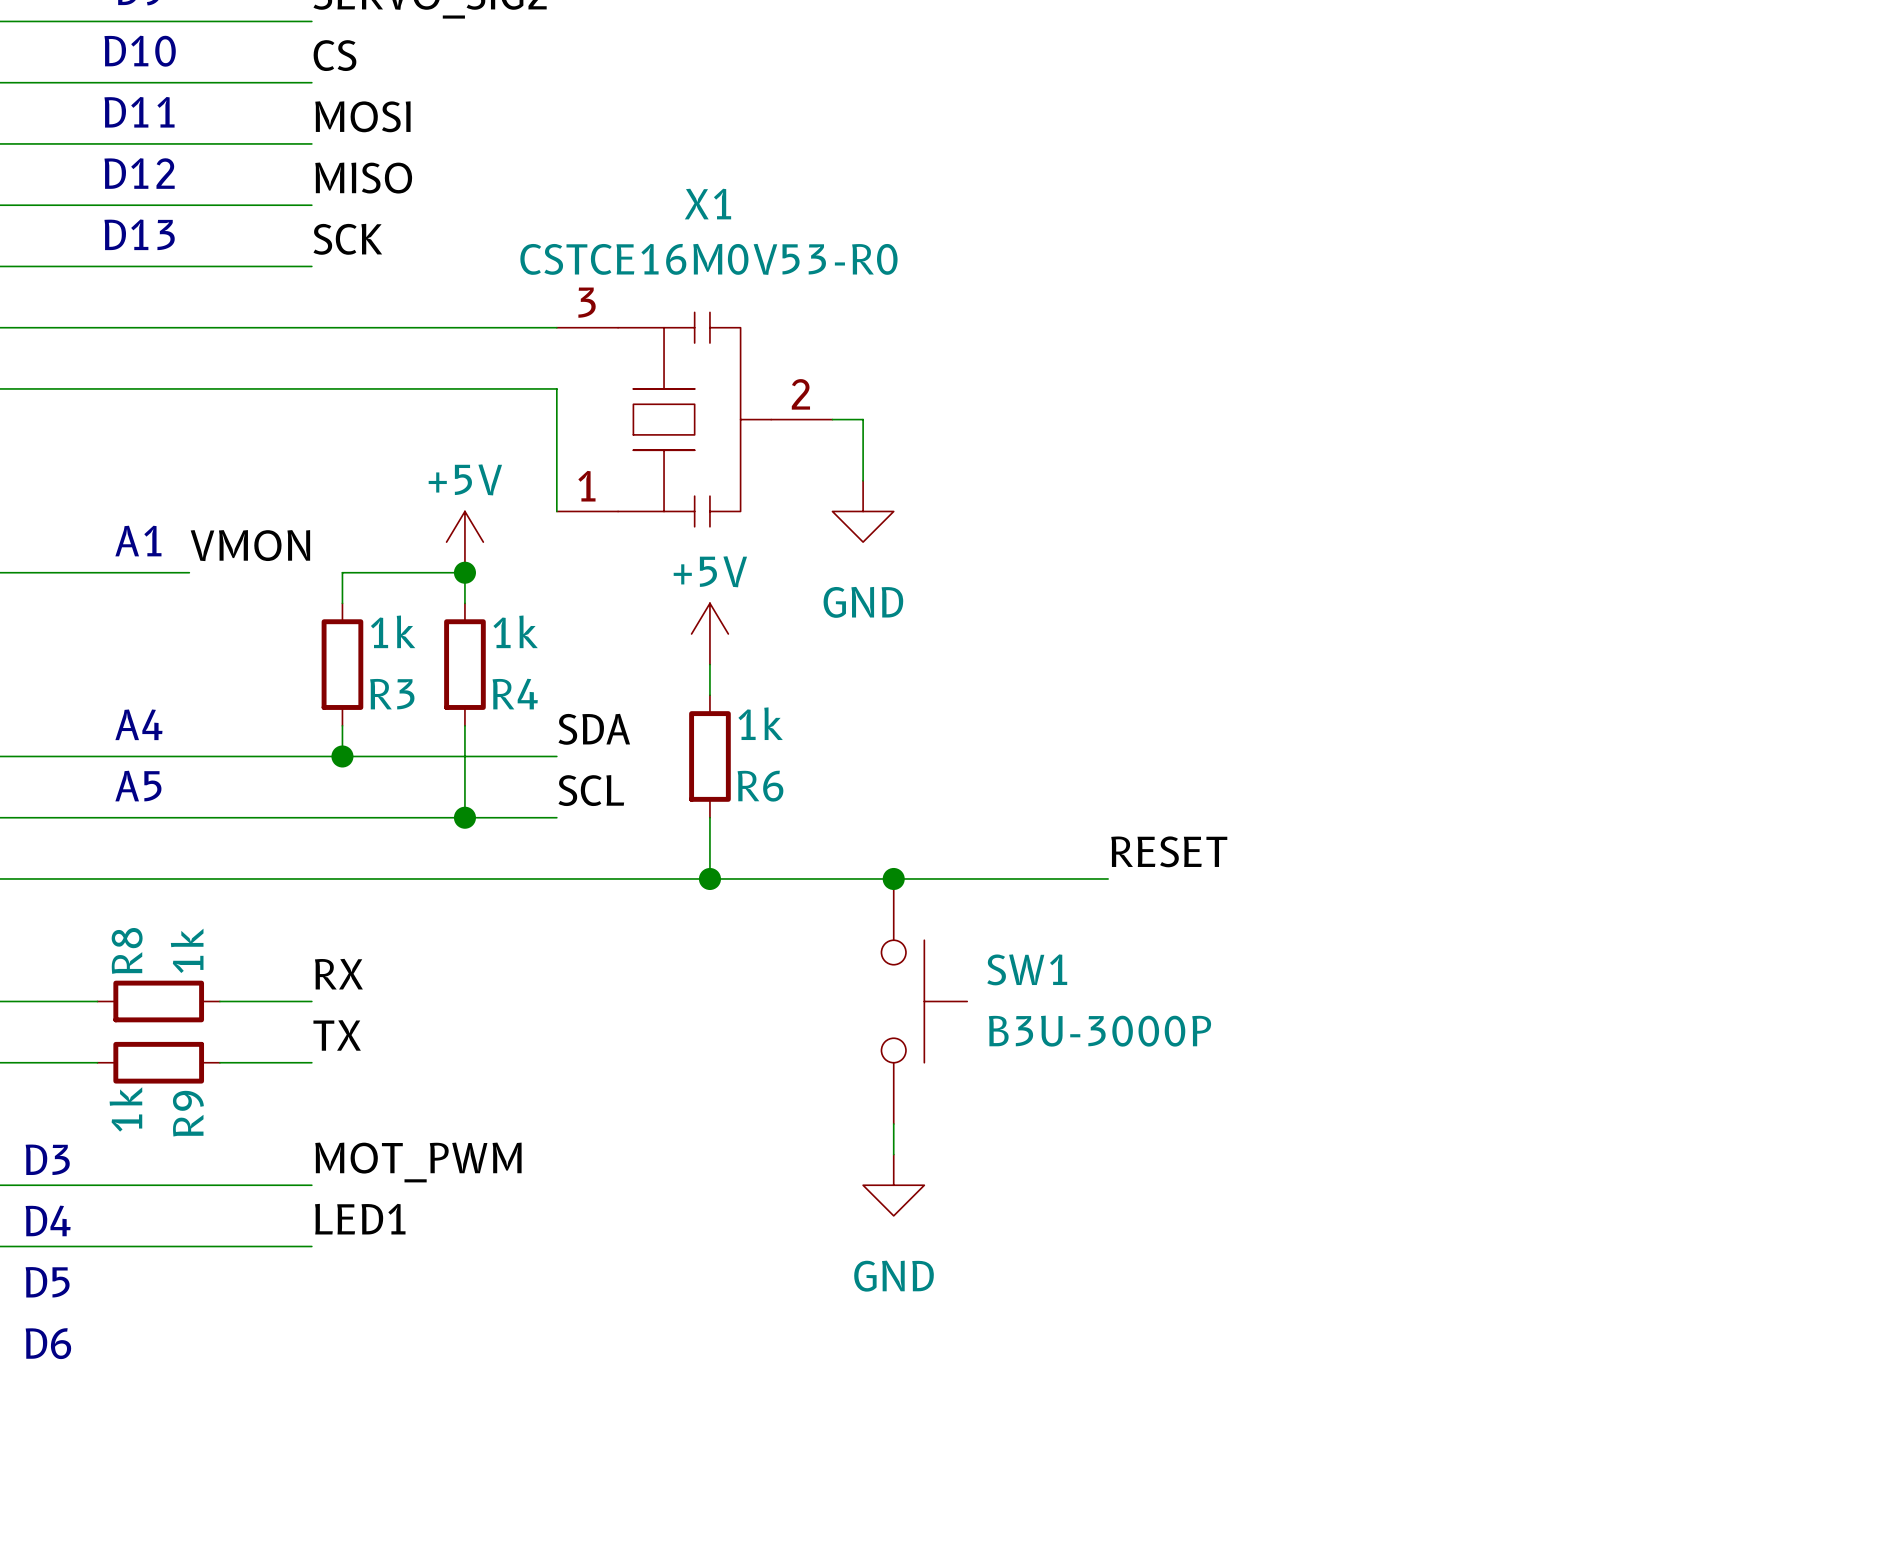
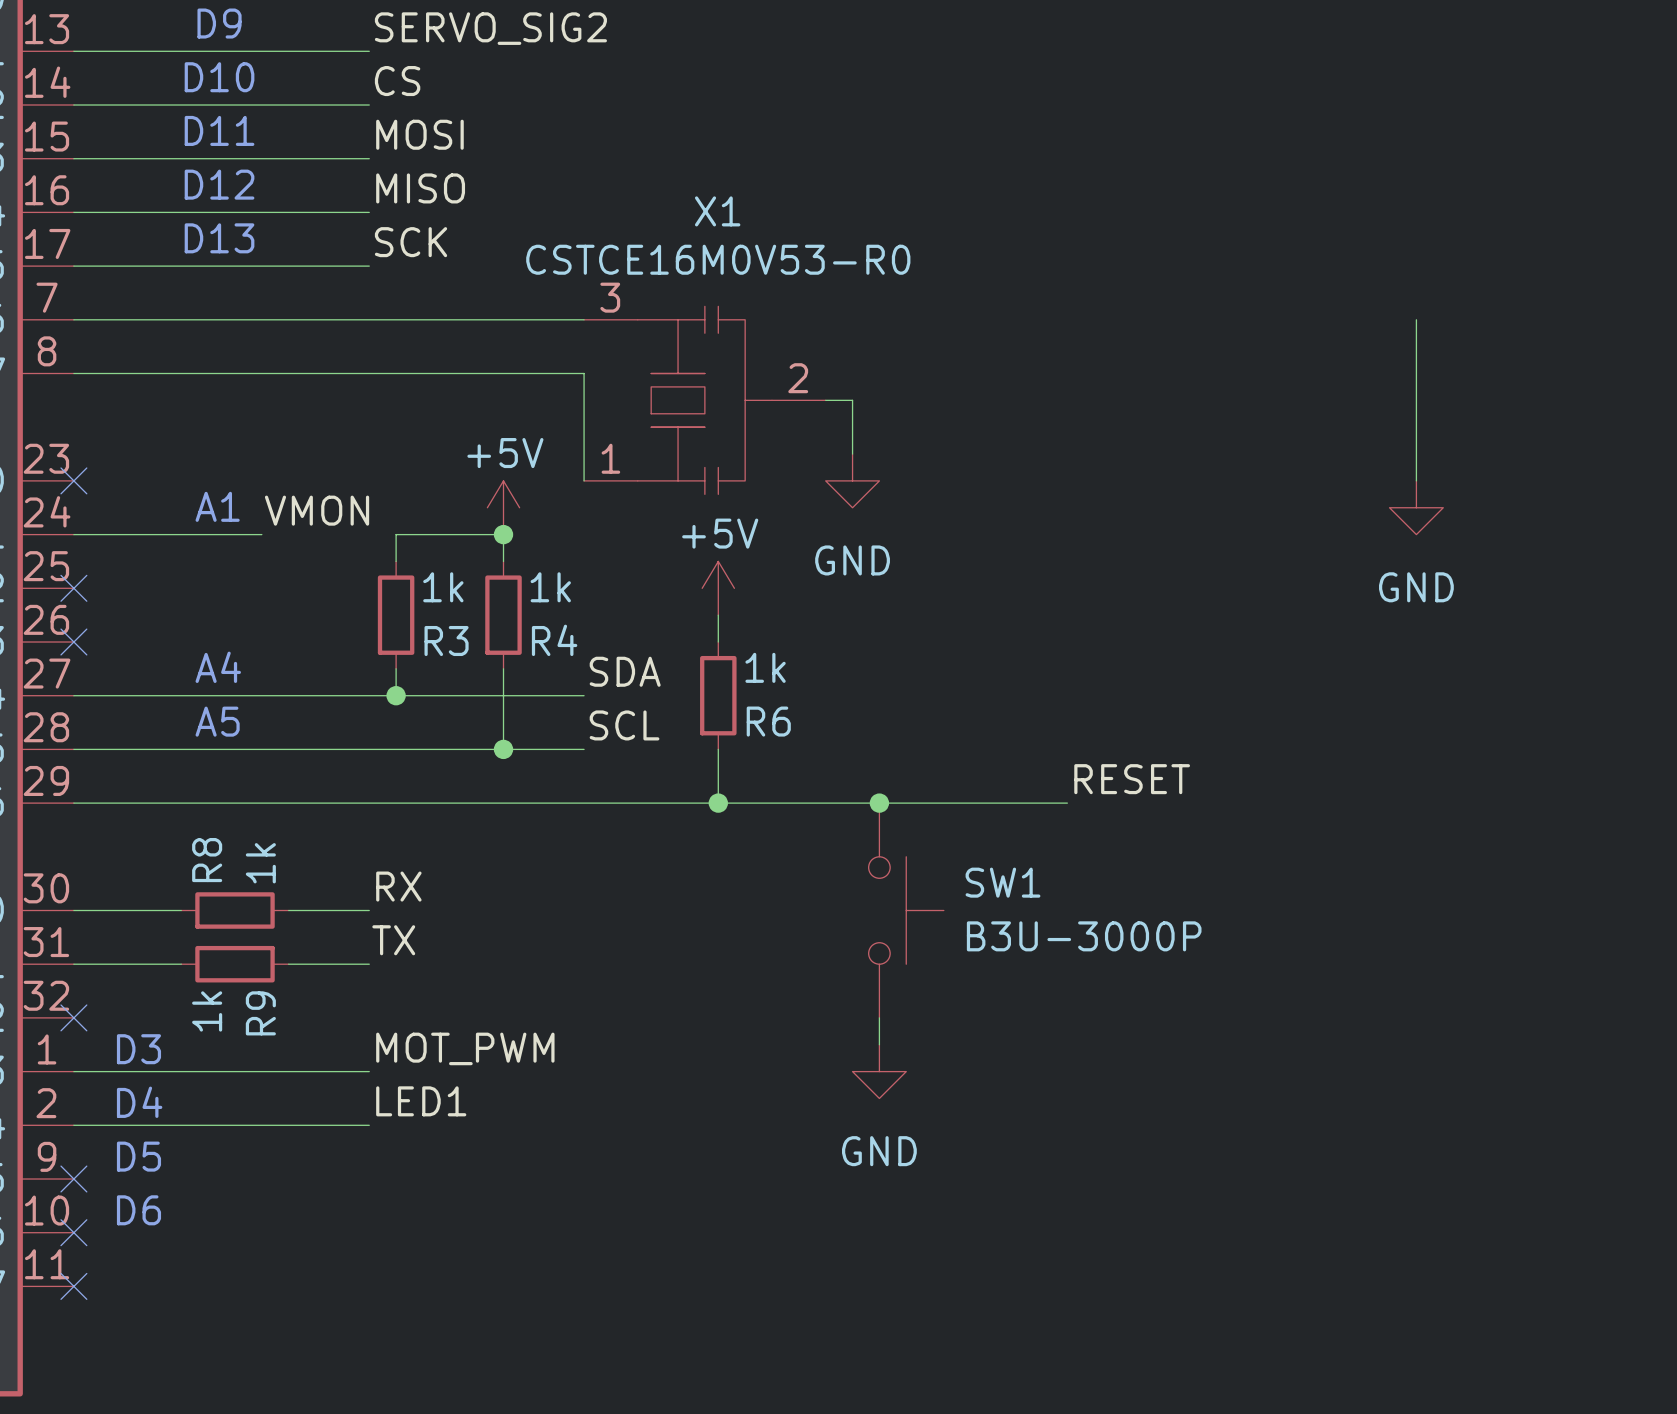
wire: none -> (1416, 319) (1416, 480)
power symbol: none -> GND (1416, 507)

